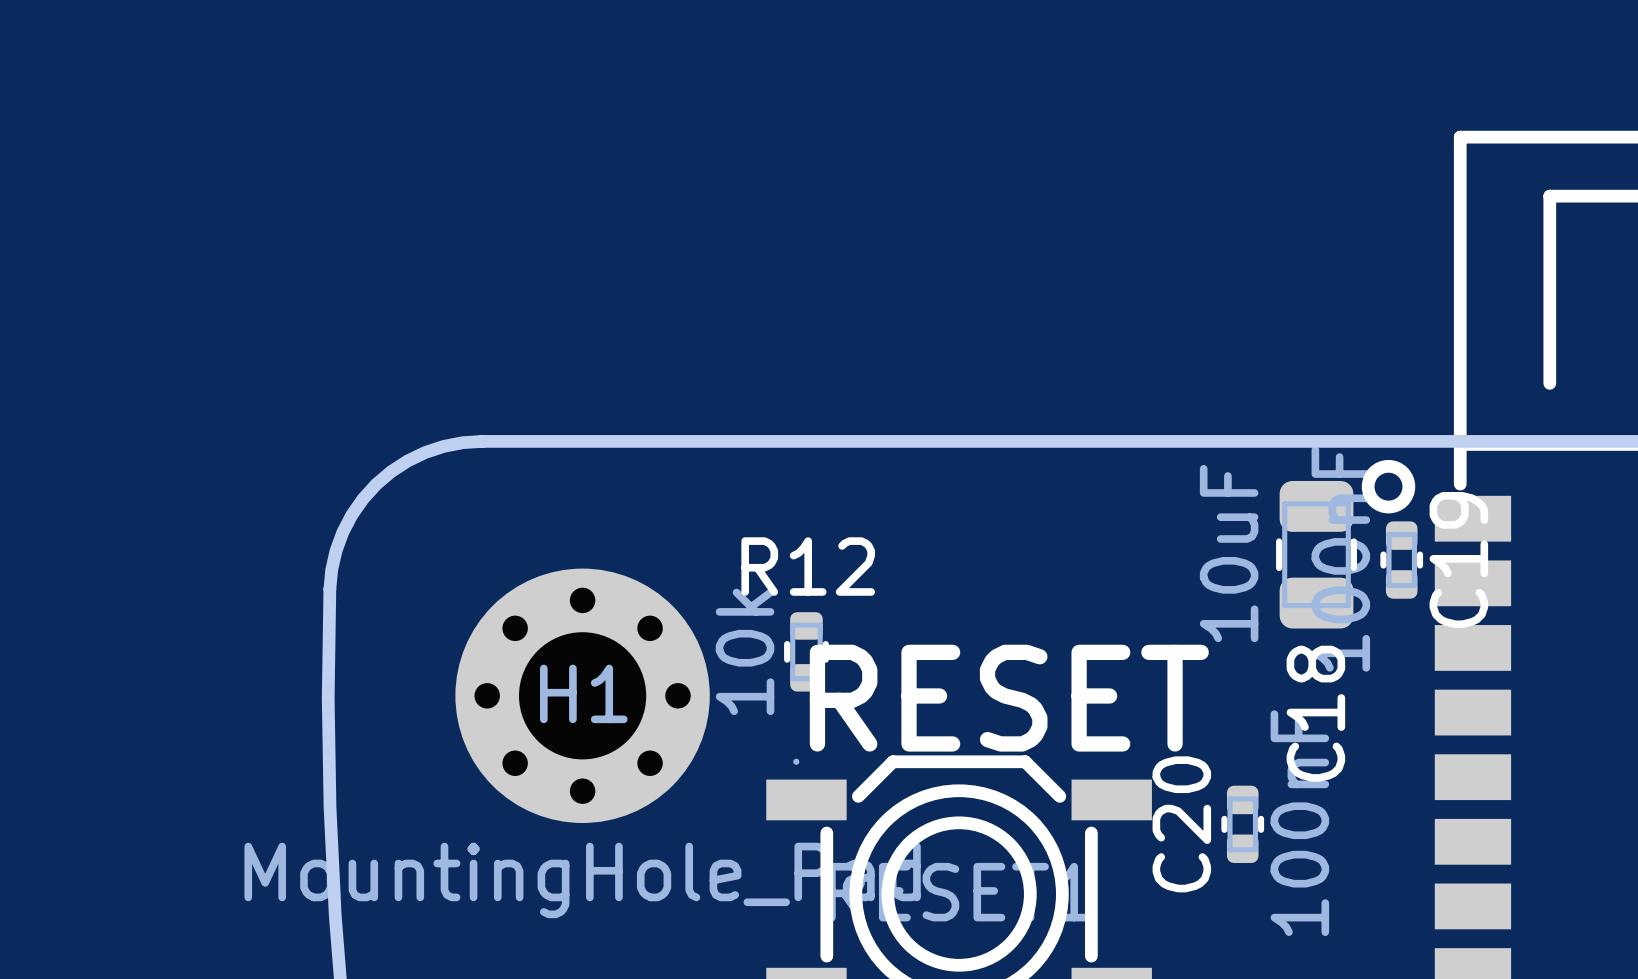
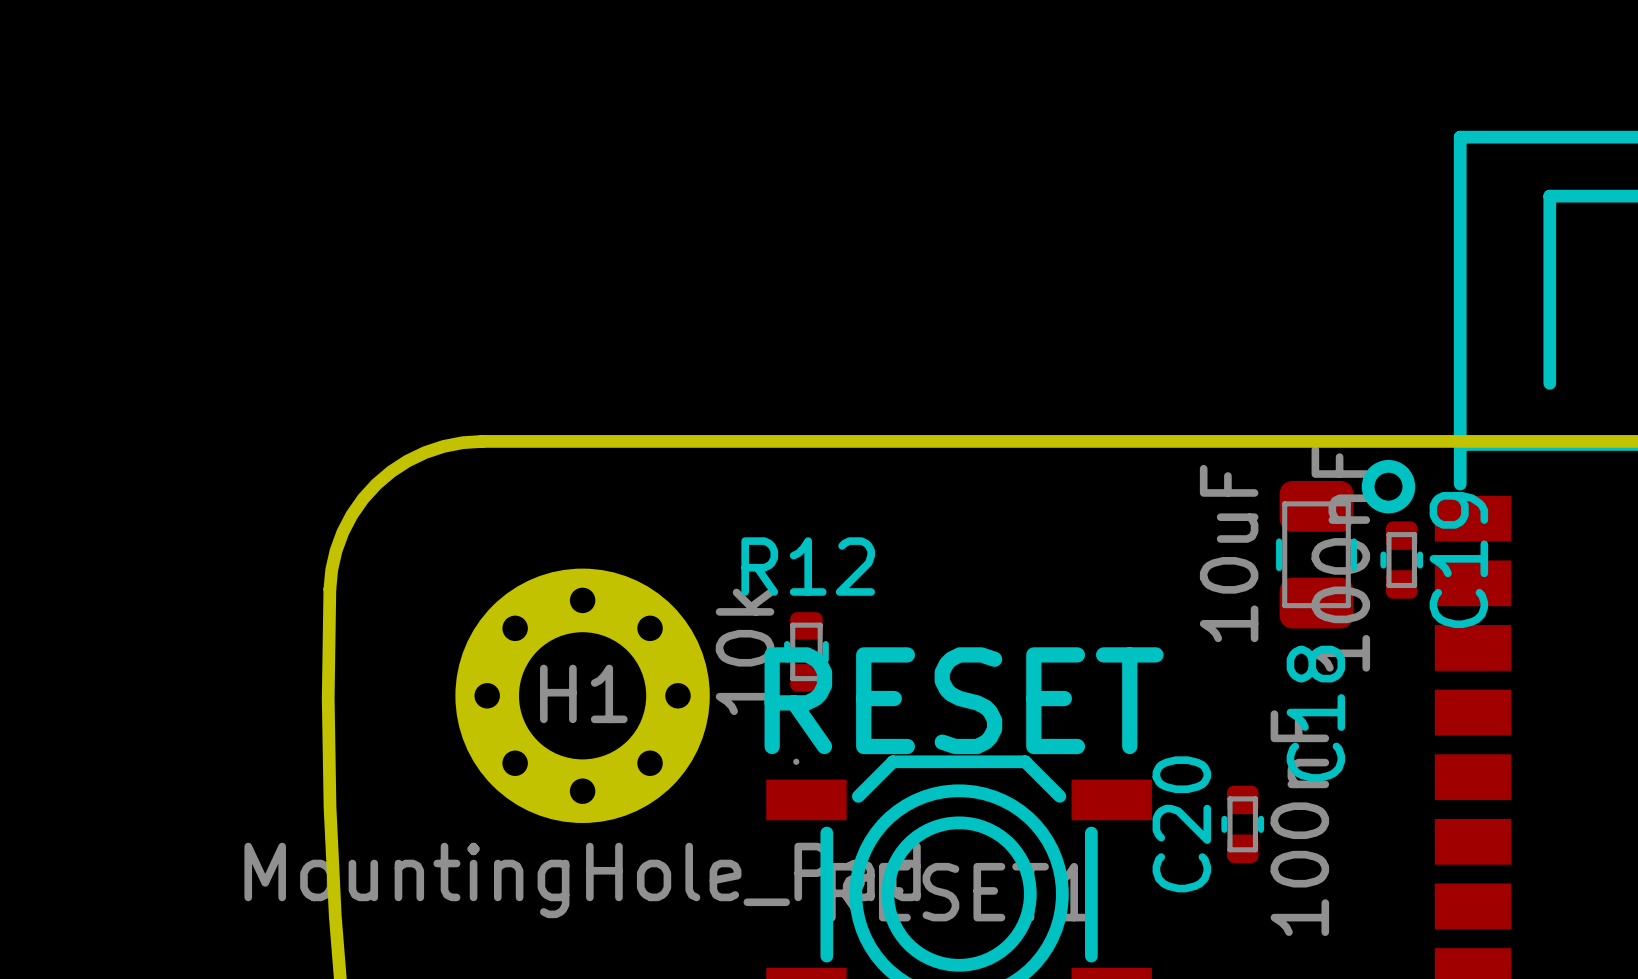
text position: RESET (1009, 698) -> RESET (964, 700)

